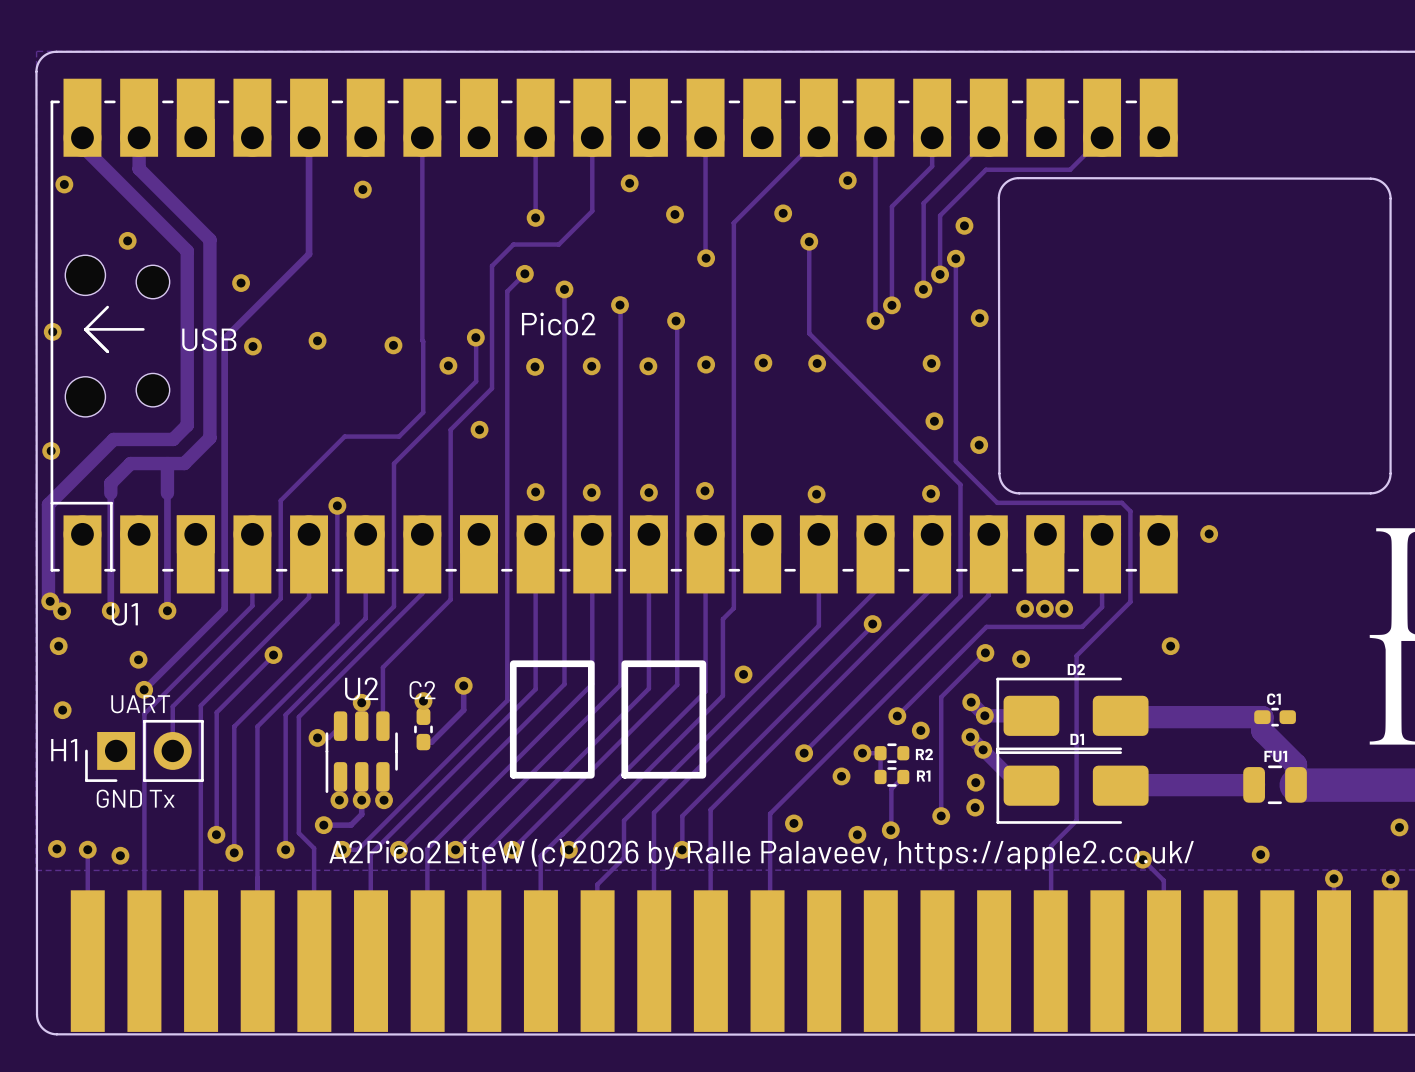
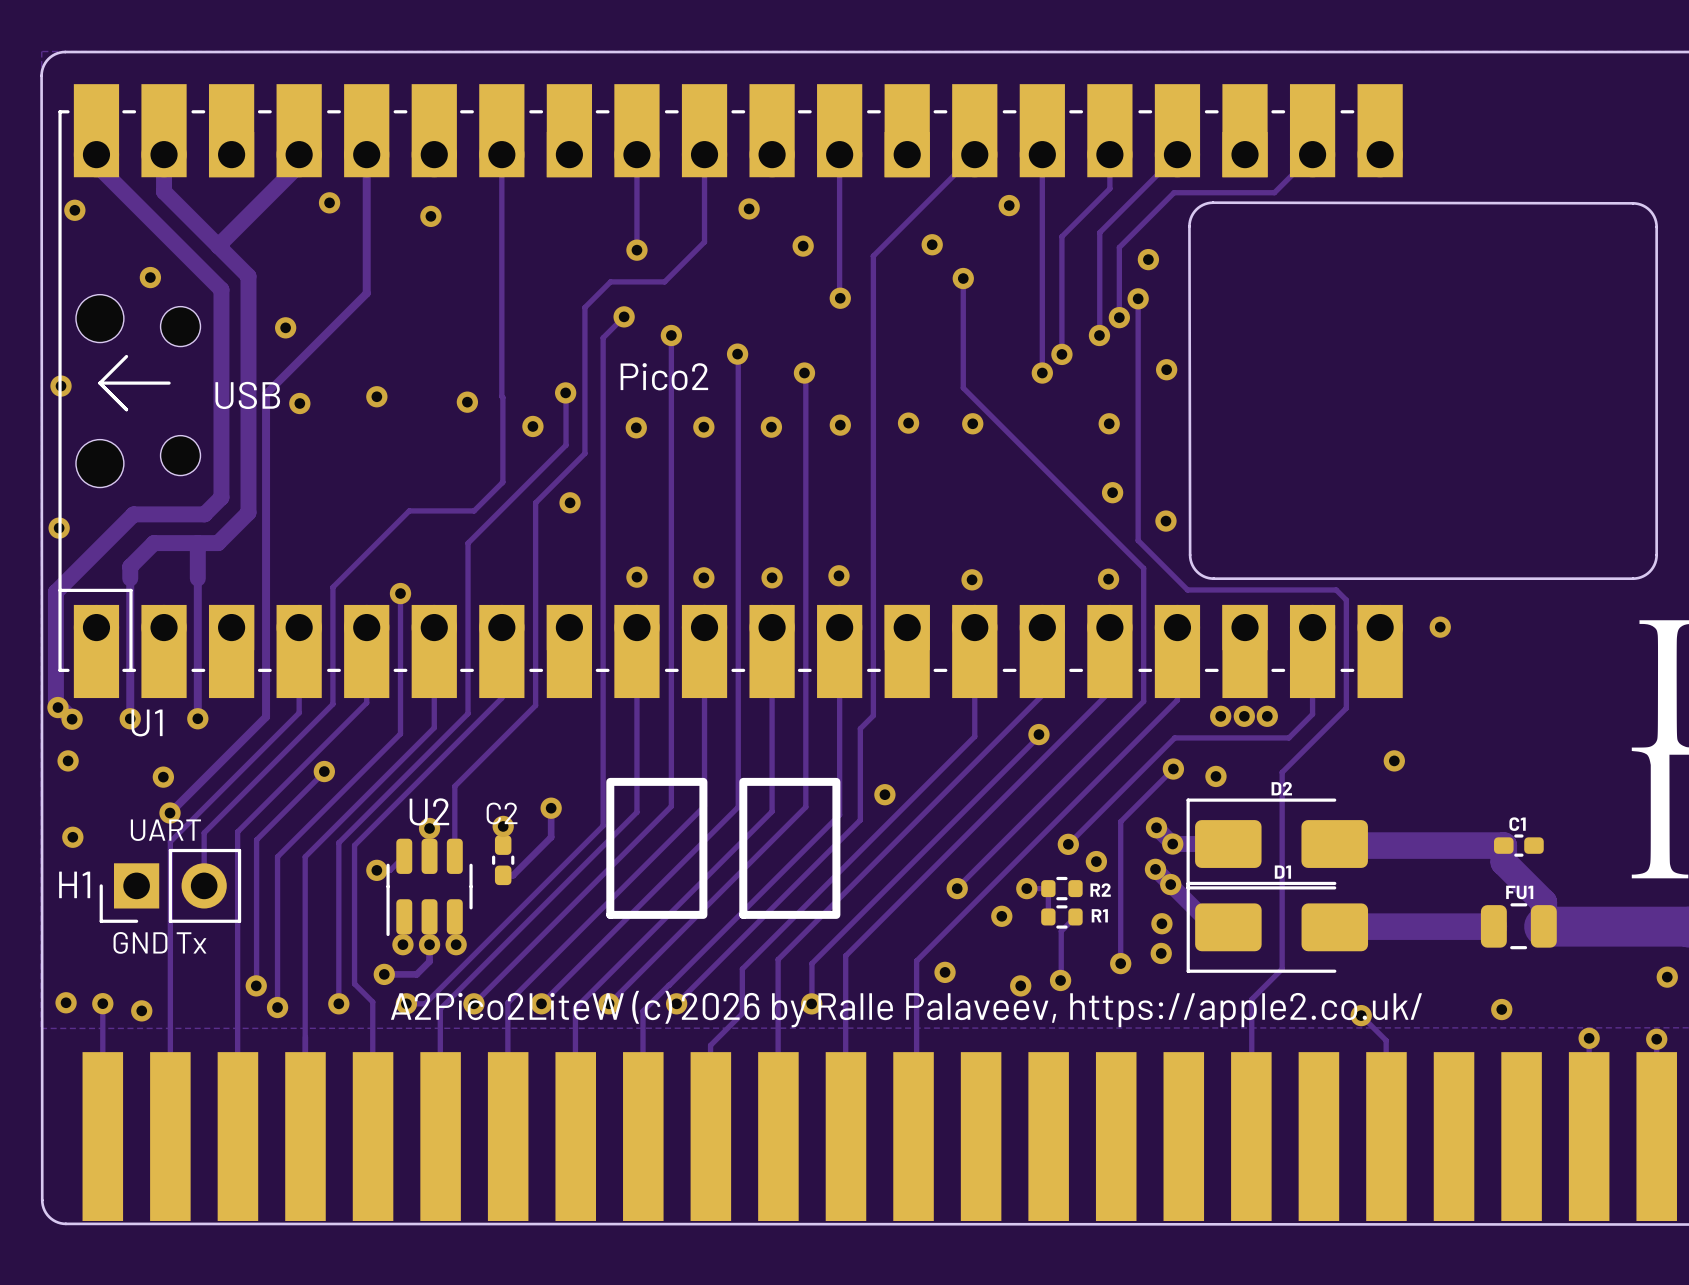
track: none -> (299, 154) (299, 165) (218, 246)
via: none -> (329, 202)

